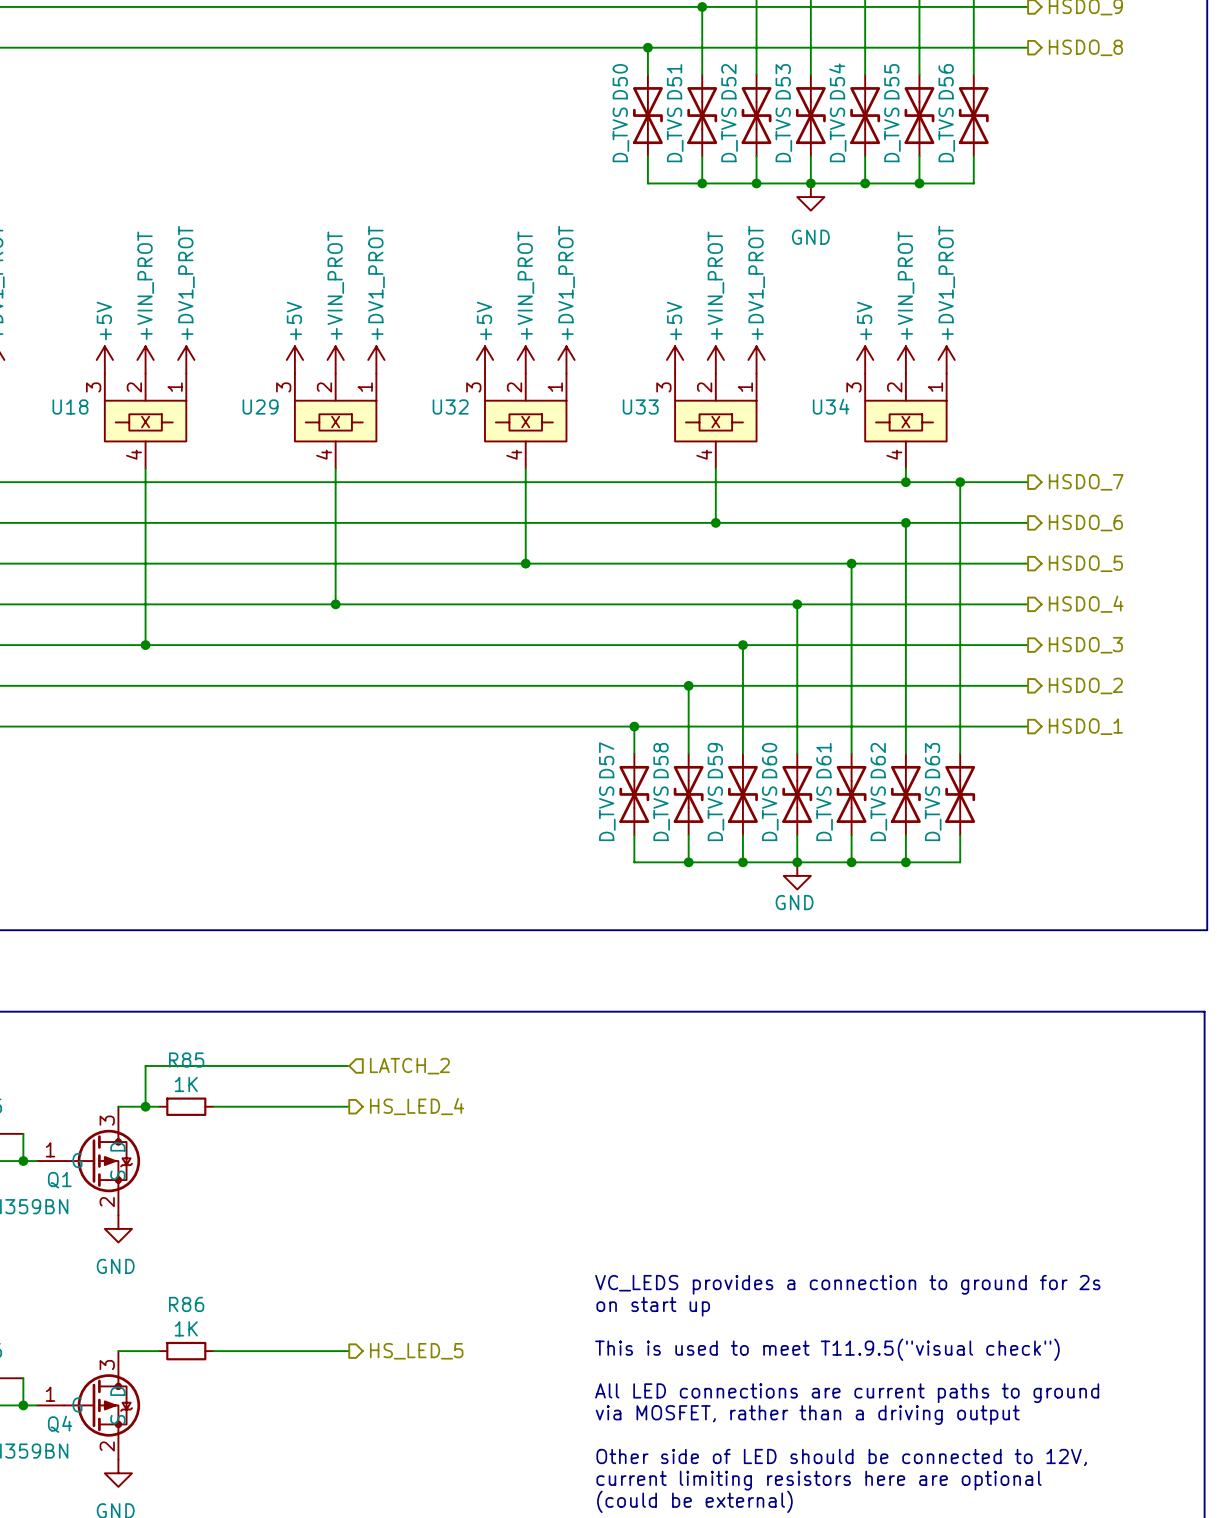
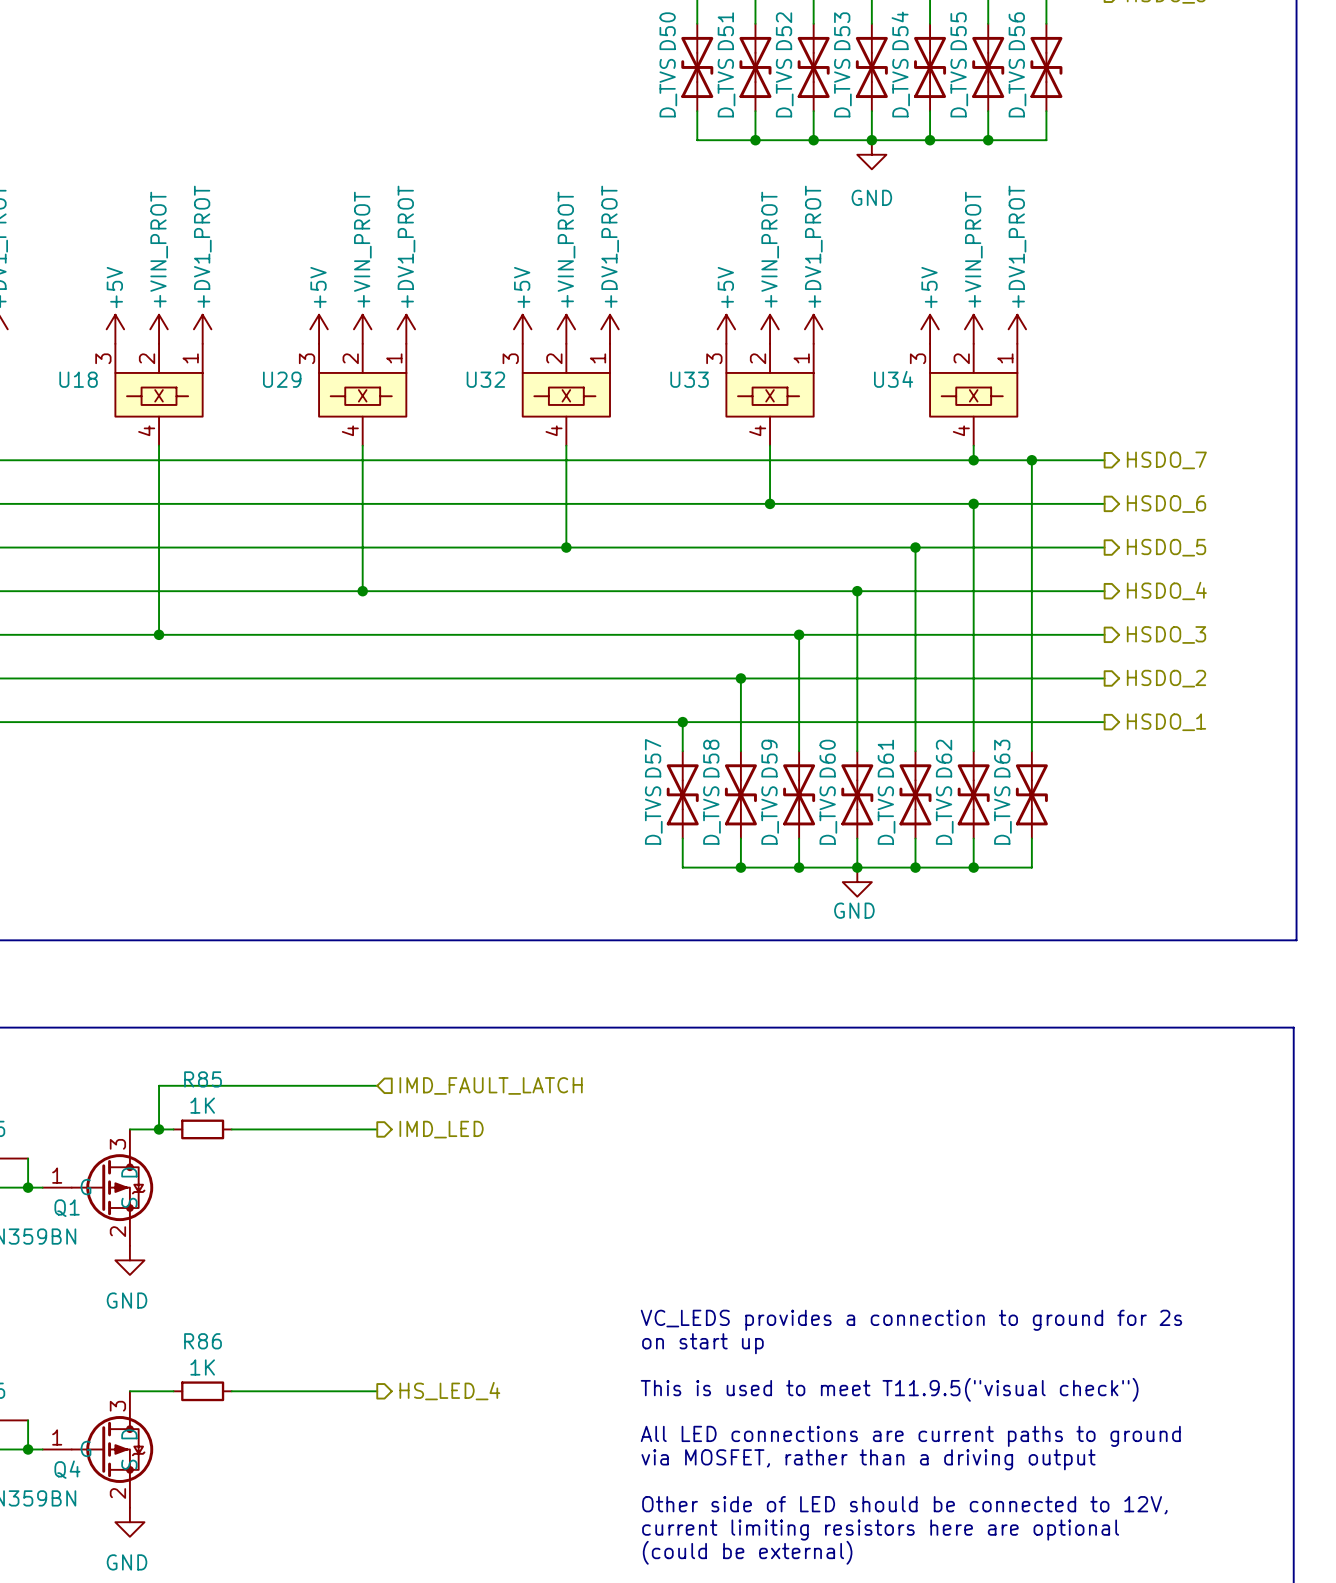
hierarchical label: LATCH_2 (409, 1066) -> IMD_FAULT_LATCH (491, 1085)
hierarchical label: HS_LED_4 (417, 1106) -> IMD_LED (441, 1129)
hierarchical label: HS_LED_5 (416, 1351) -> HS_LED_4 (449, 1391)

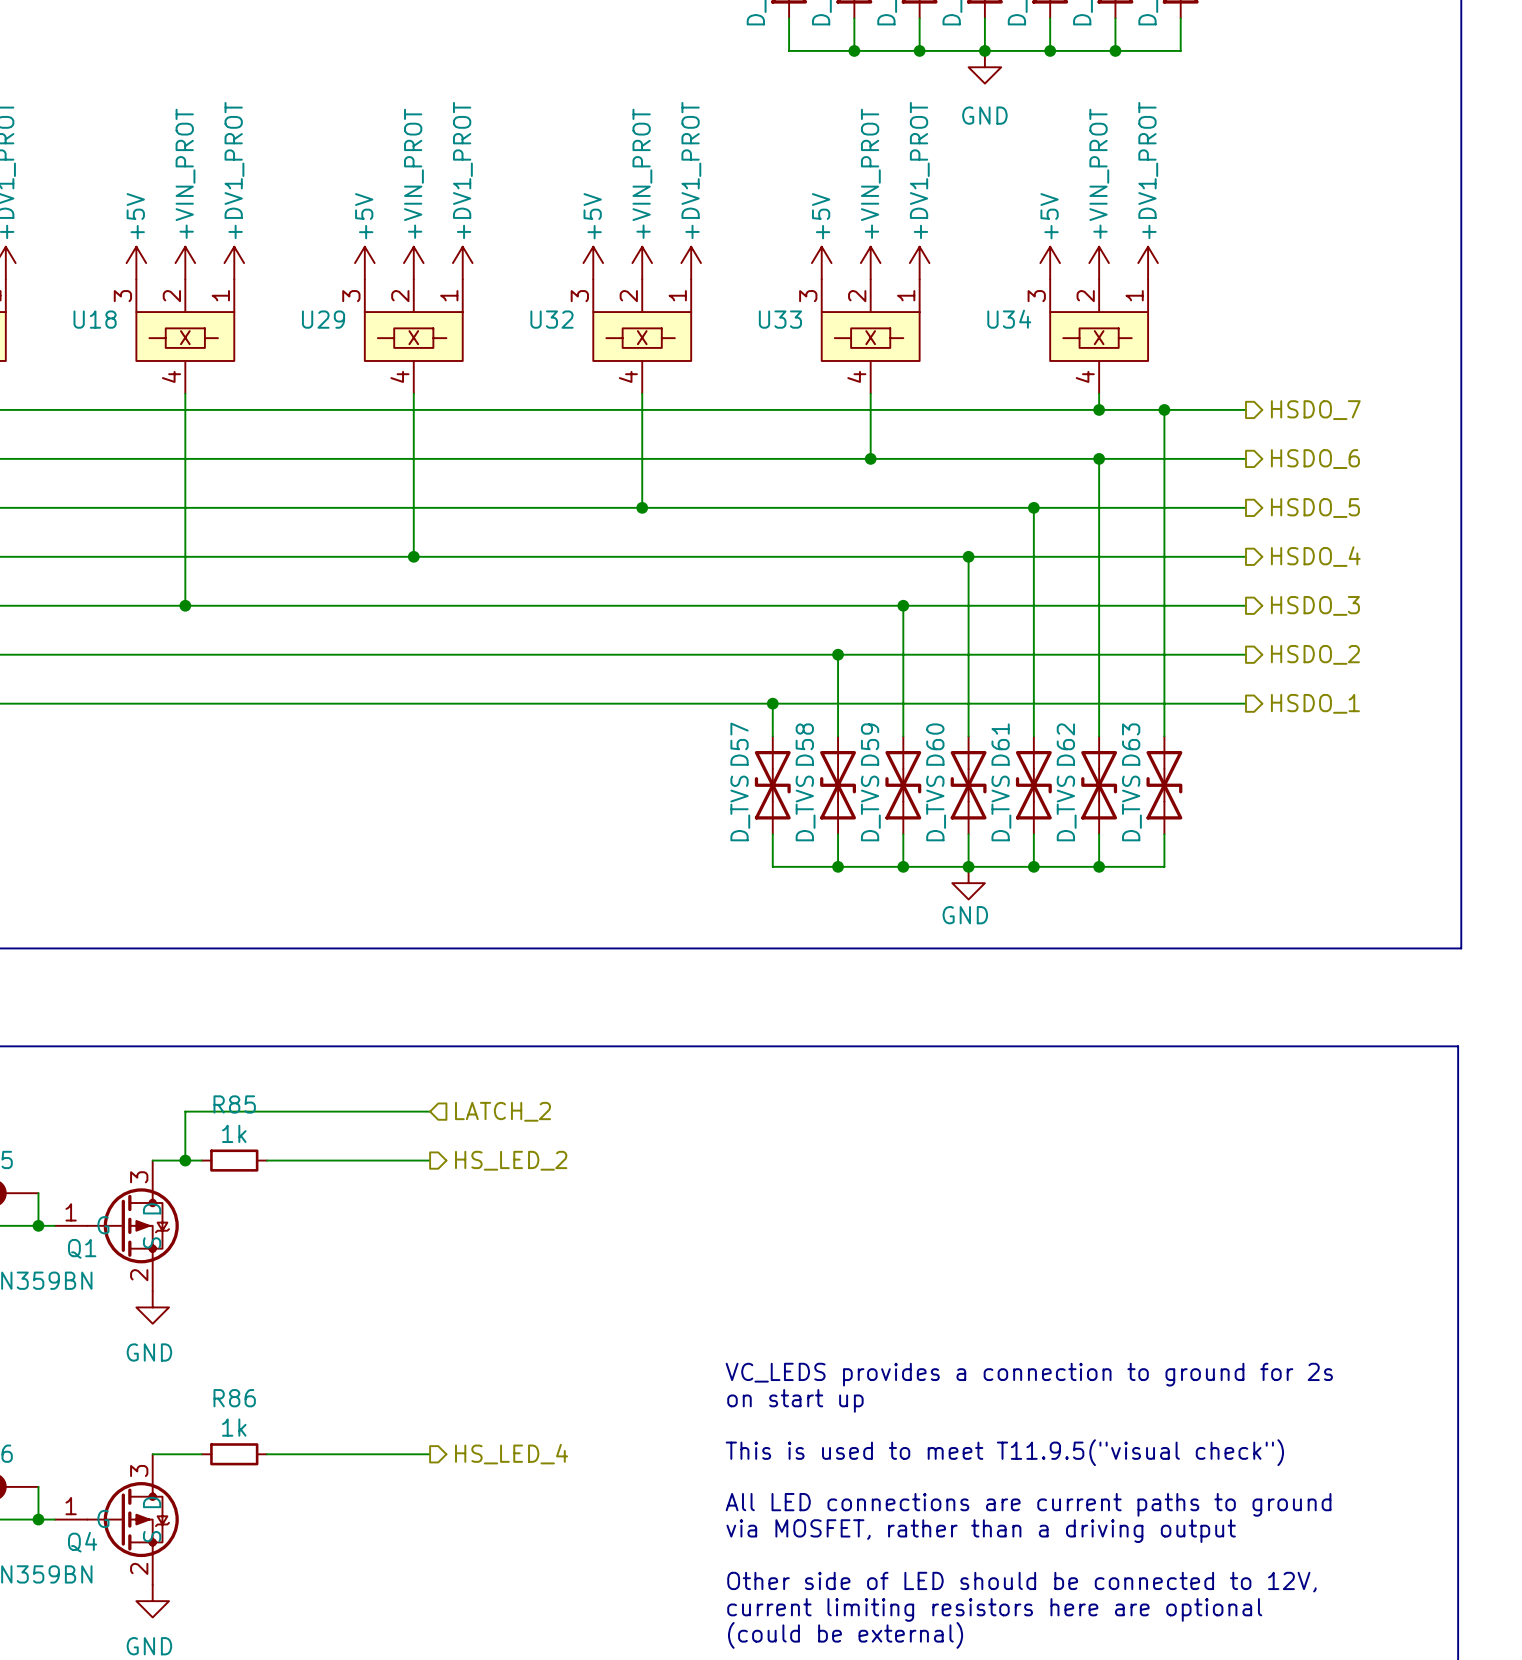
hierarchical label: IMD_FAULT_LATCH (491, 1085) -> LATCH_2 (503, 1111)
R85 value: 1K (202, 1105) -> 1k (234, 1133)
hierarchical label: IMD_LED (441, 1129) -> HS_LED_2 (511, 1160)
R86 value: 1K (202, 1367) -> 1k (234, 1427)

